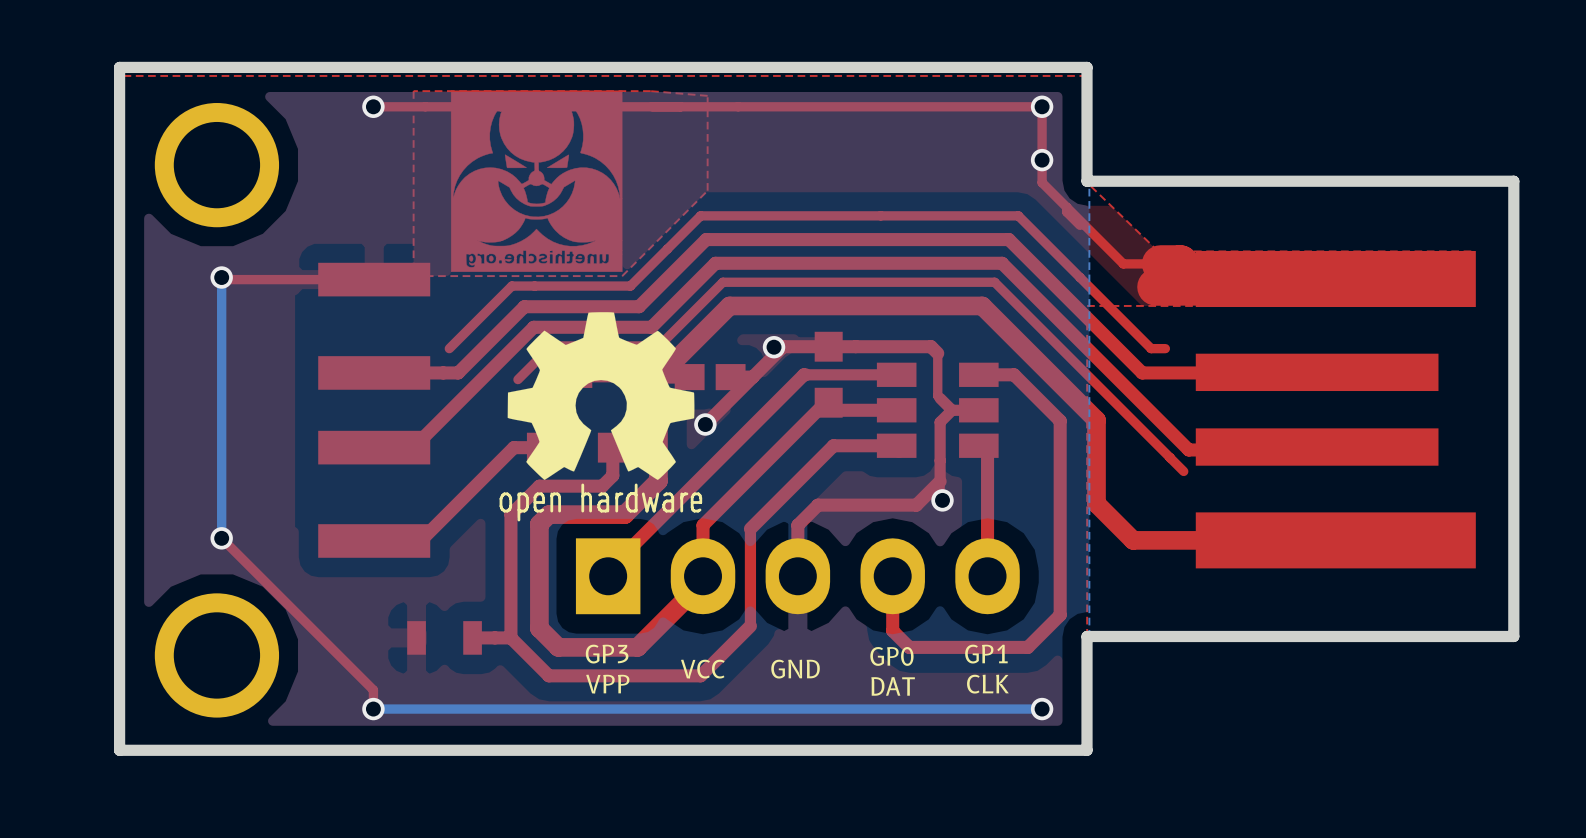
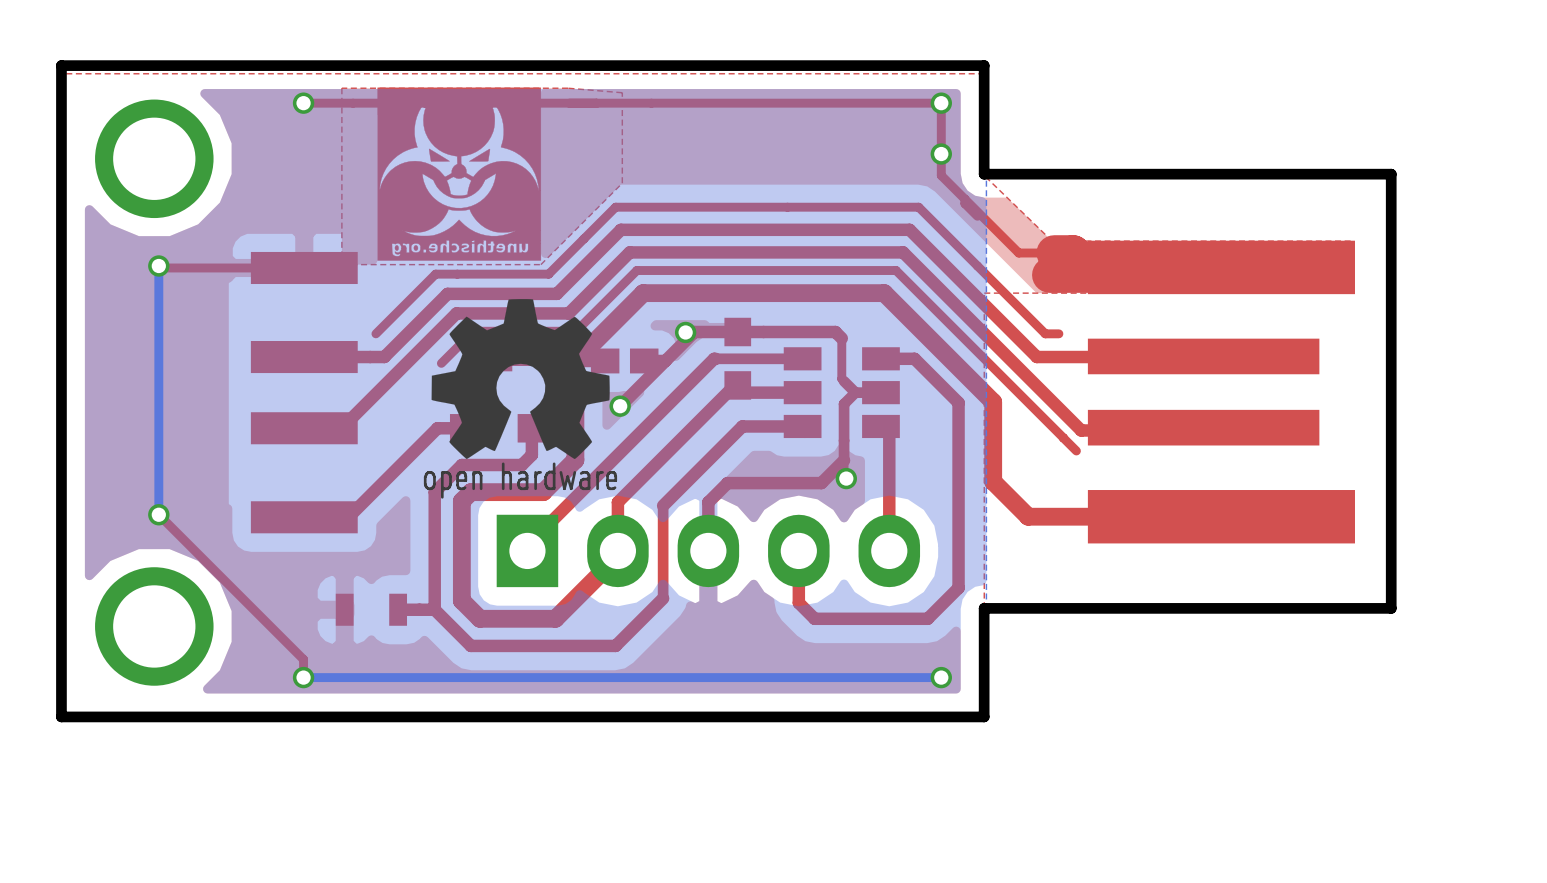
text: GP3 (607, 654) -> none
text: GP1 (986, 654) -> none
text: GP0 (891, 656) -> none
text: VCC (702, 669) -> none
text: GND (795, 669) -> none
text: VPP (607, 684) -> none
text: CLK (987, 684) -> none
text: DAT (893, 686) -> none

